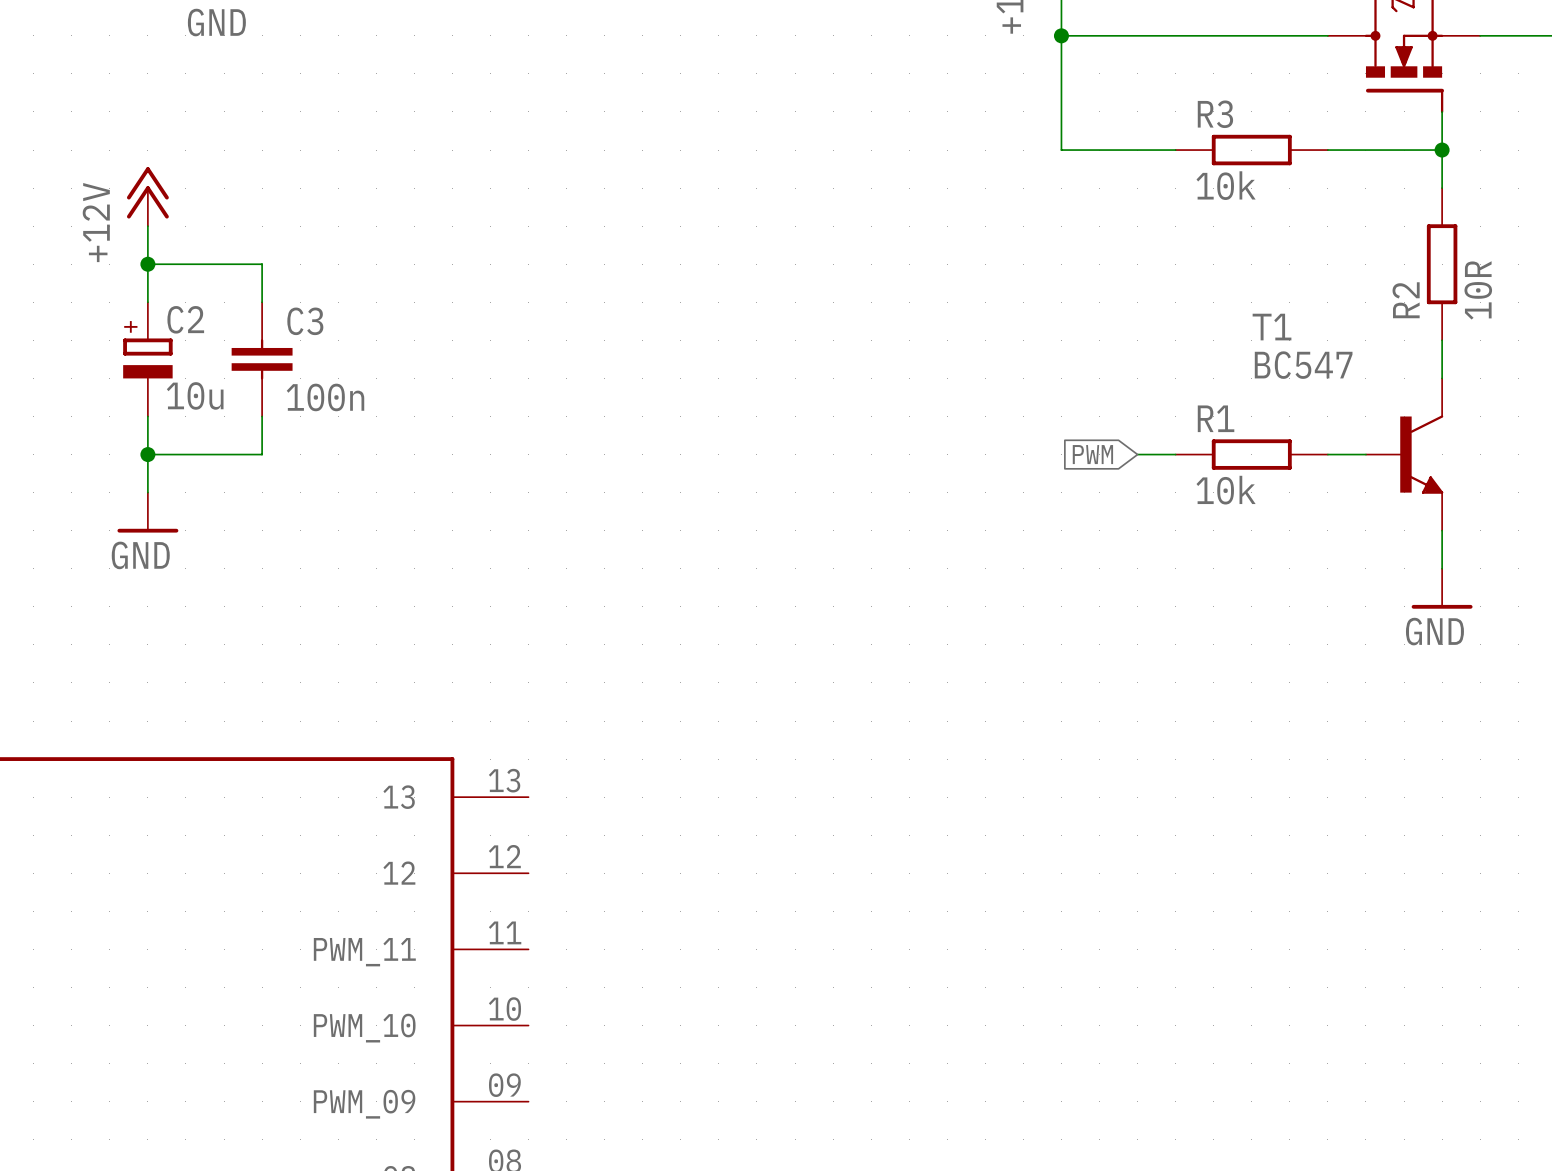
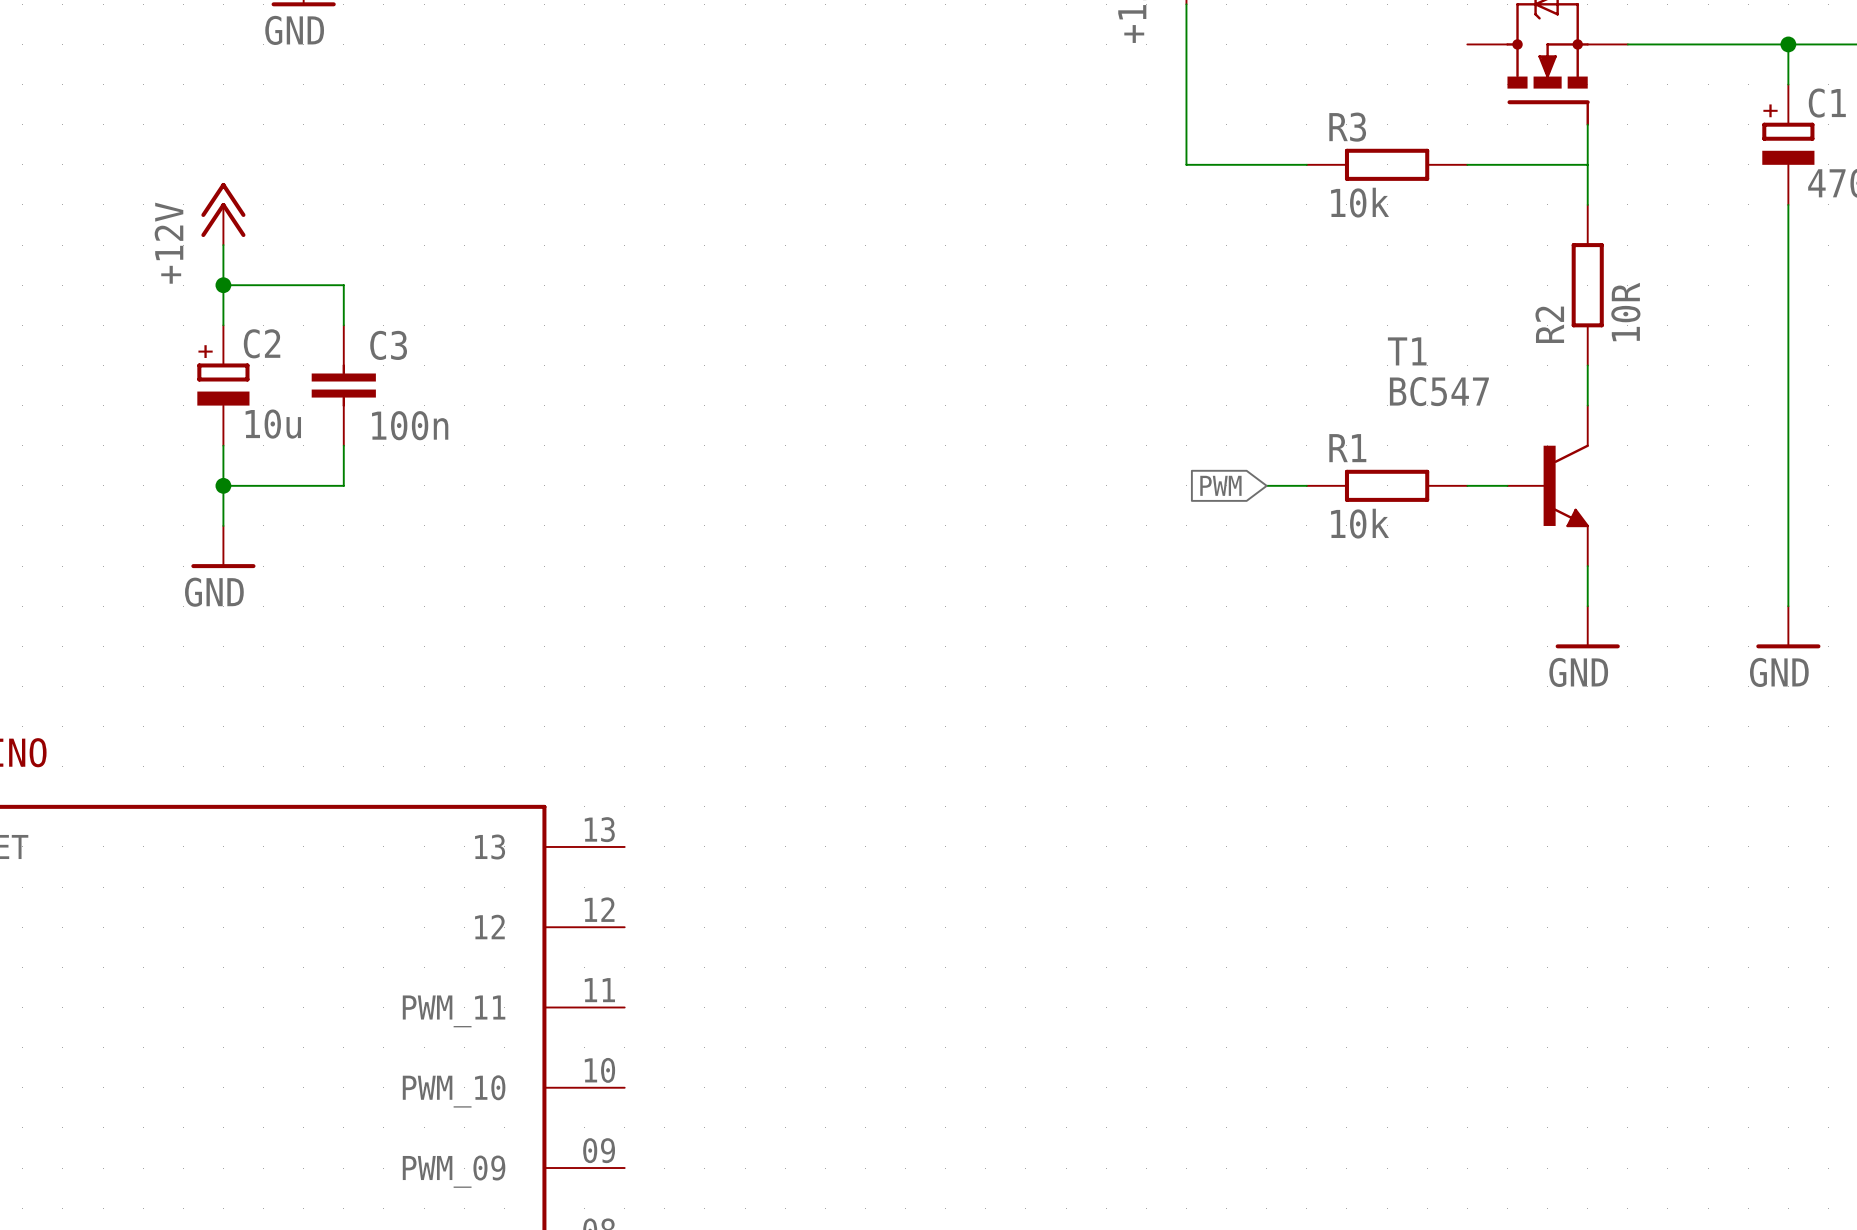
wire: (1061, 35) (1327, 35) -> none
junction: (1061, 35) -> none
junction: (1442, 150) -> none

